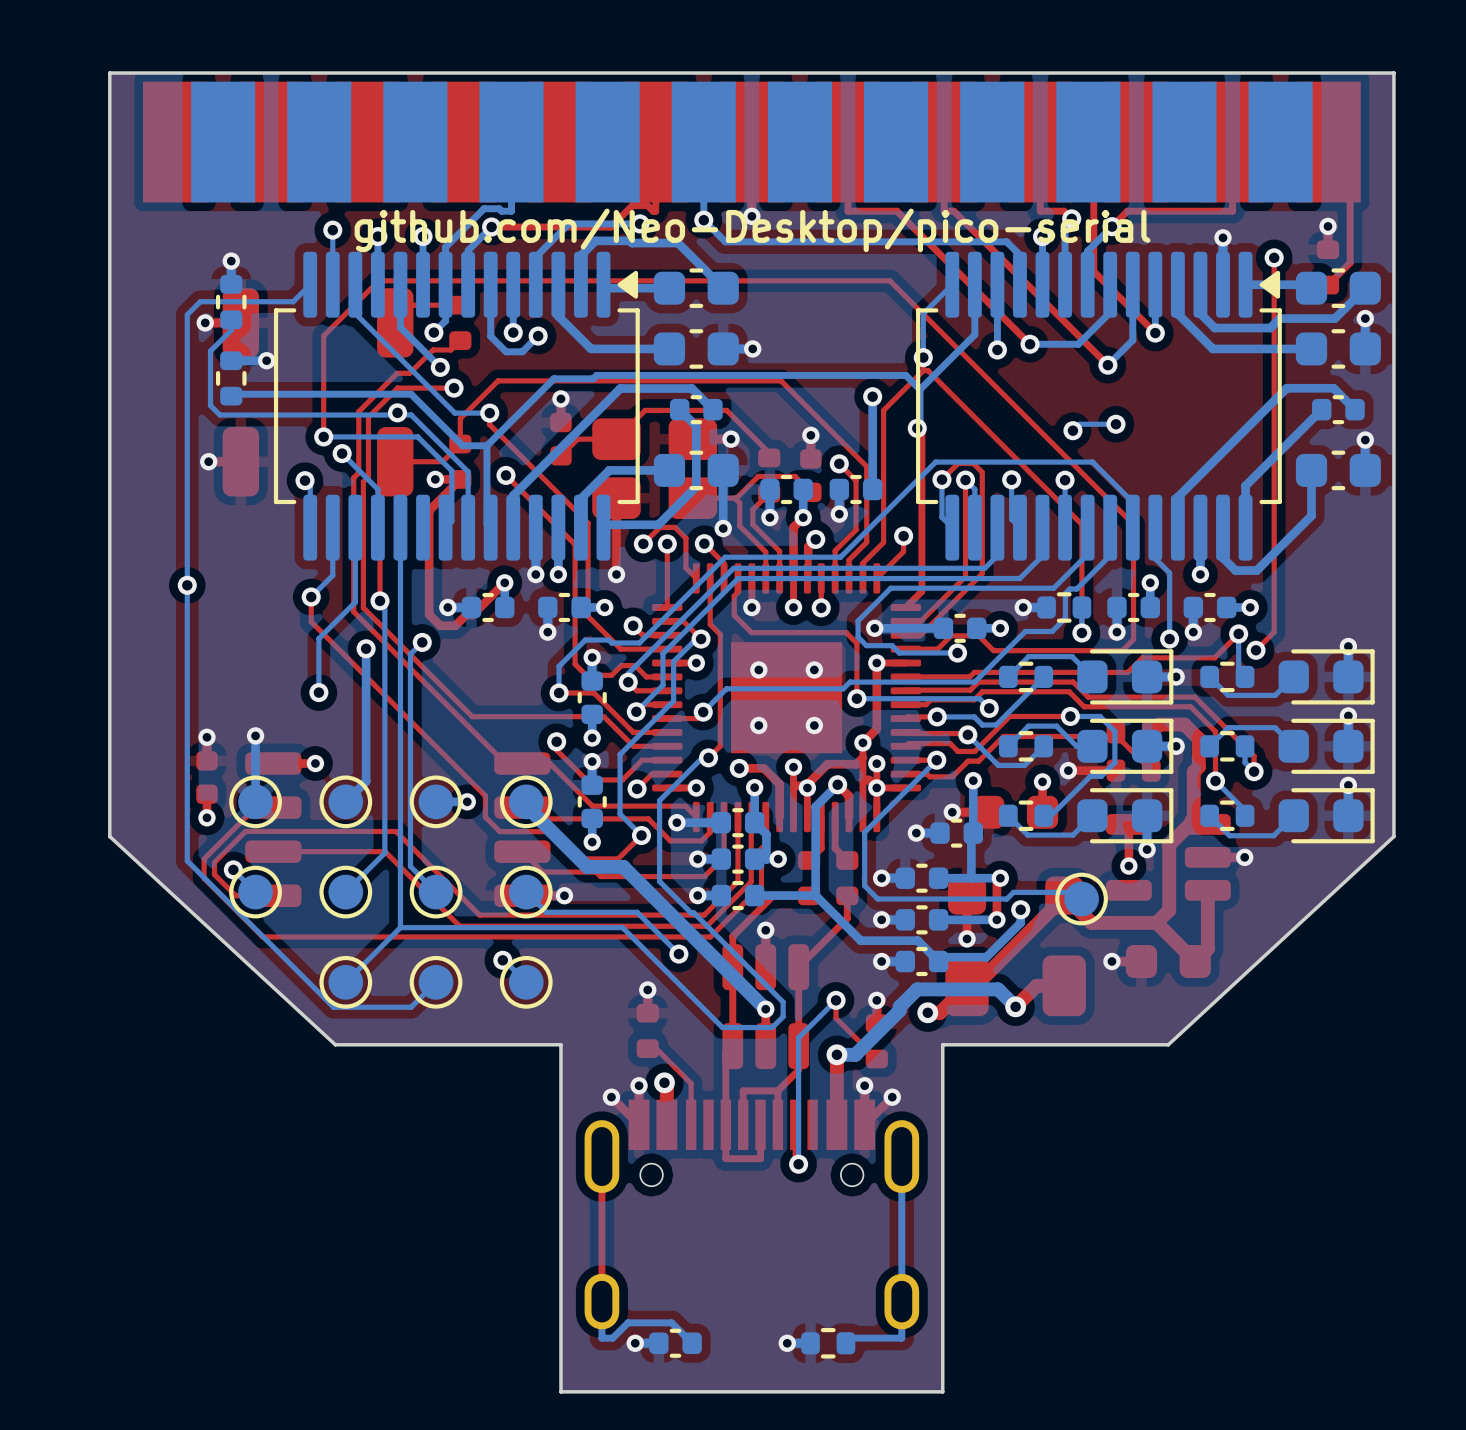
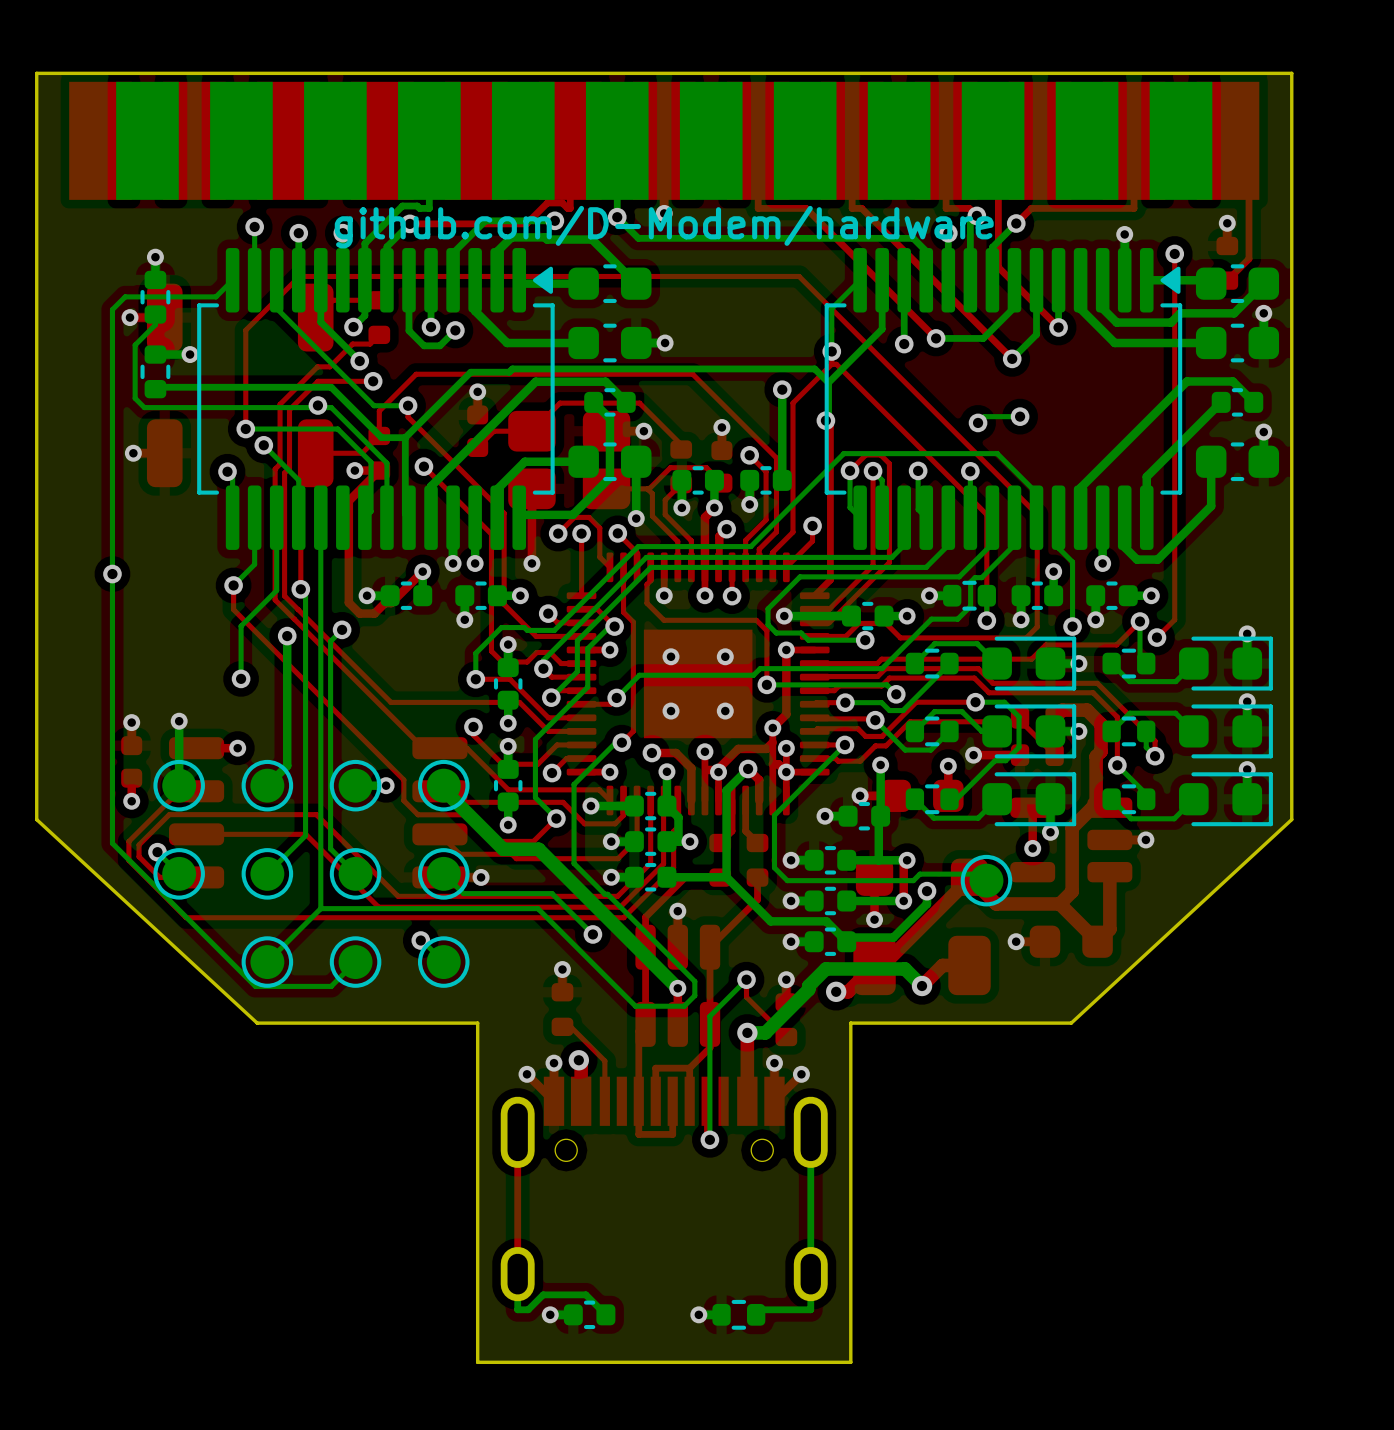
text: github.com/Neo-Desktop/pico-serial (752, 230) -> github.com/D-Modem/hardware (664, 227)

